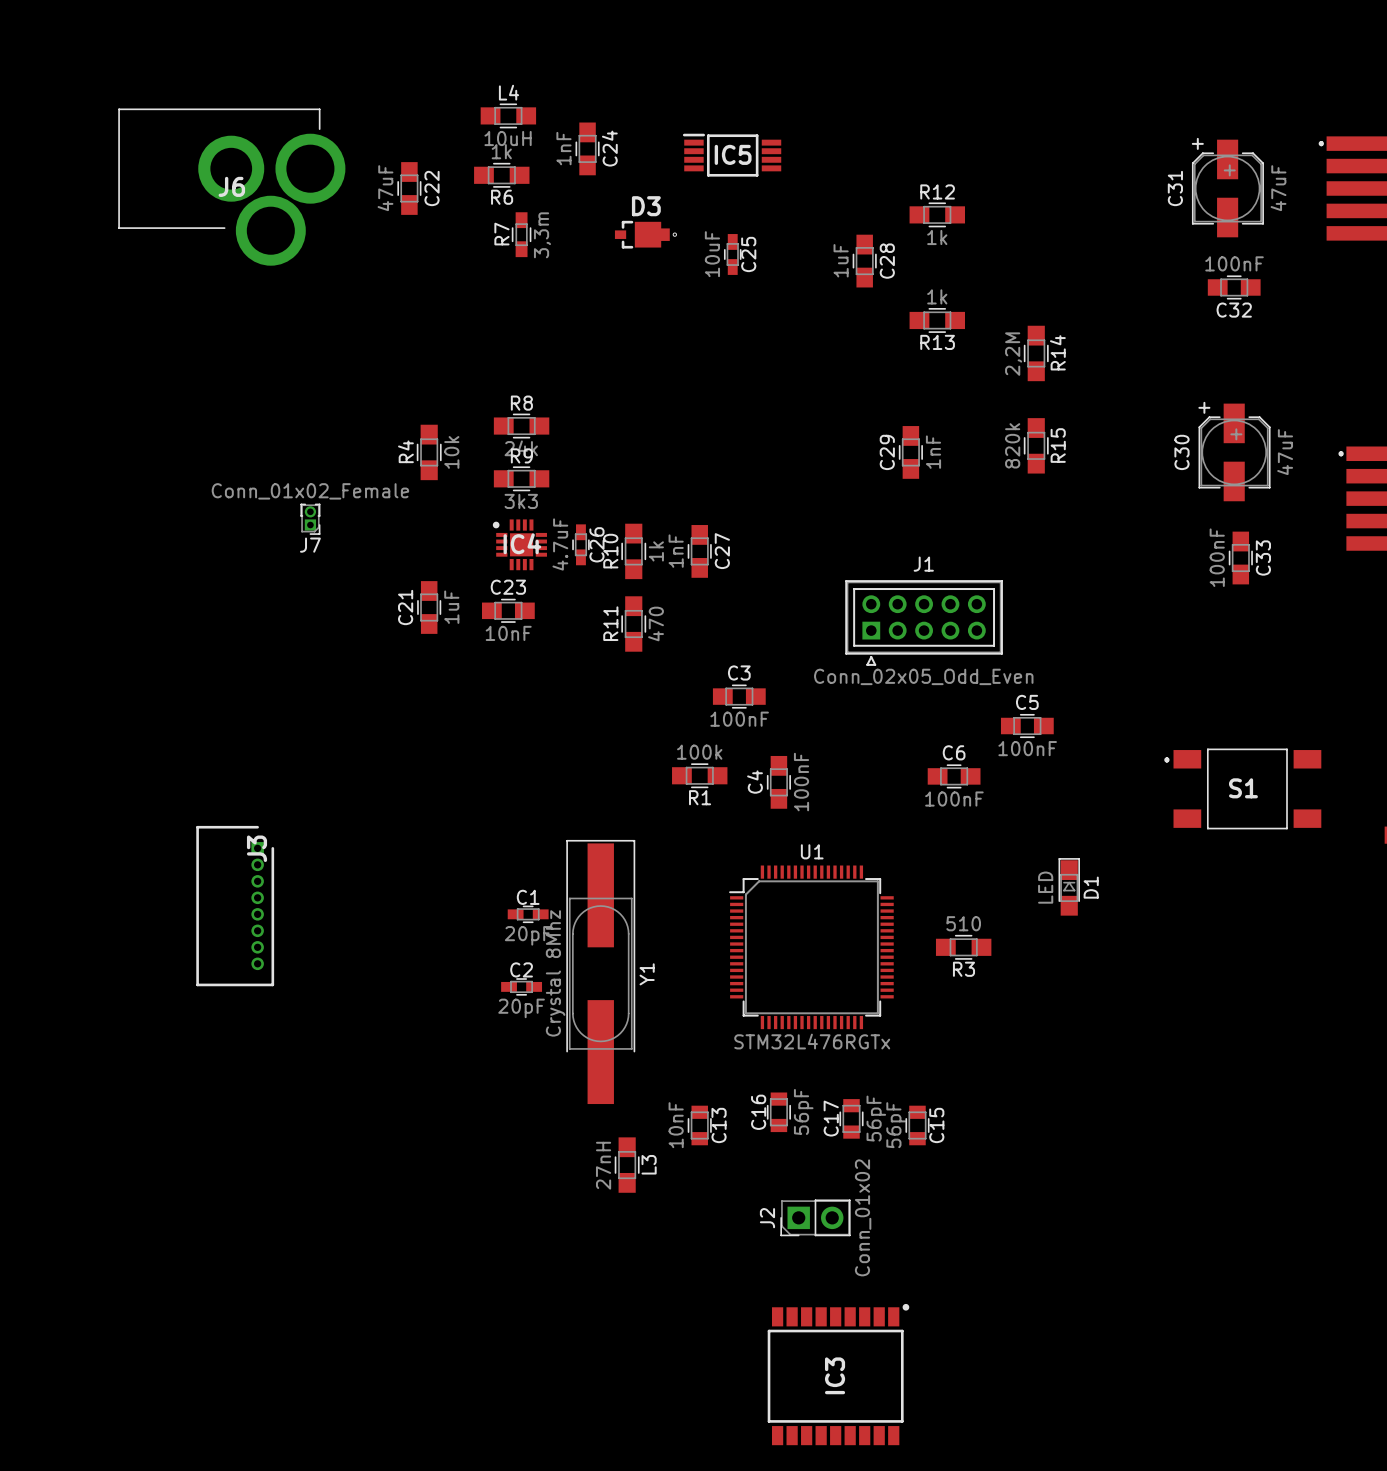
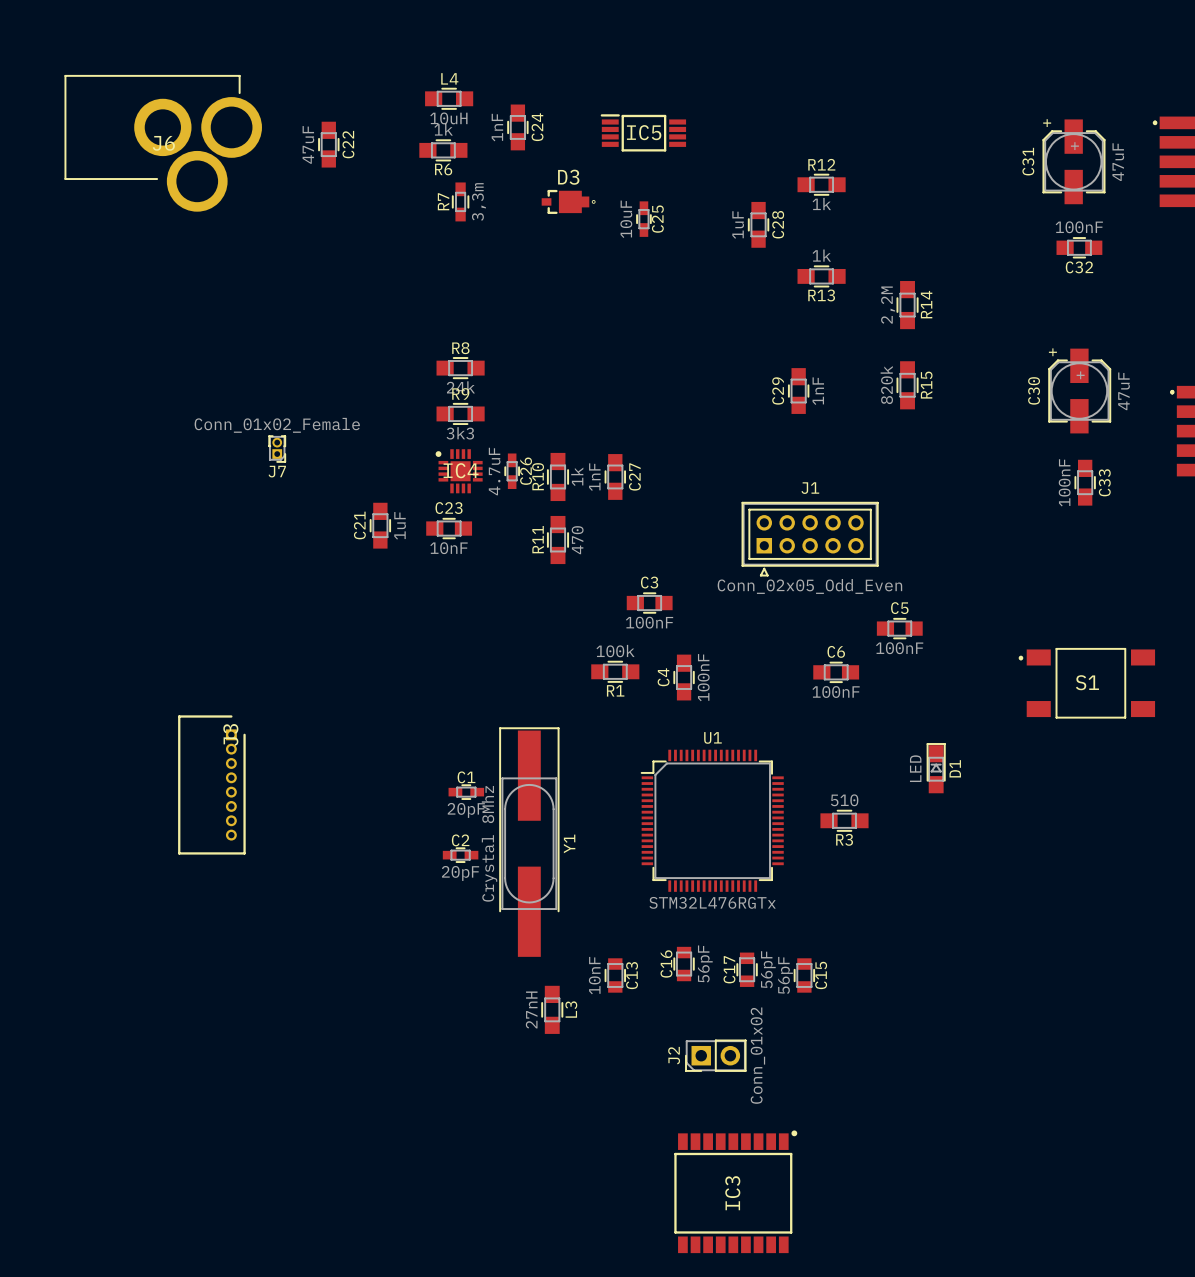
J6 position: (231, 187) -> (163, 143)
C22 position: (409, 188) -> (328, 144)
R4: 10k (429, 452) -> none

